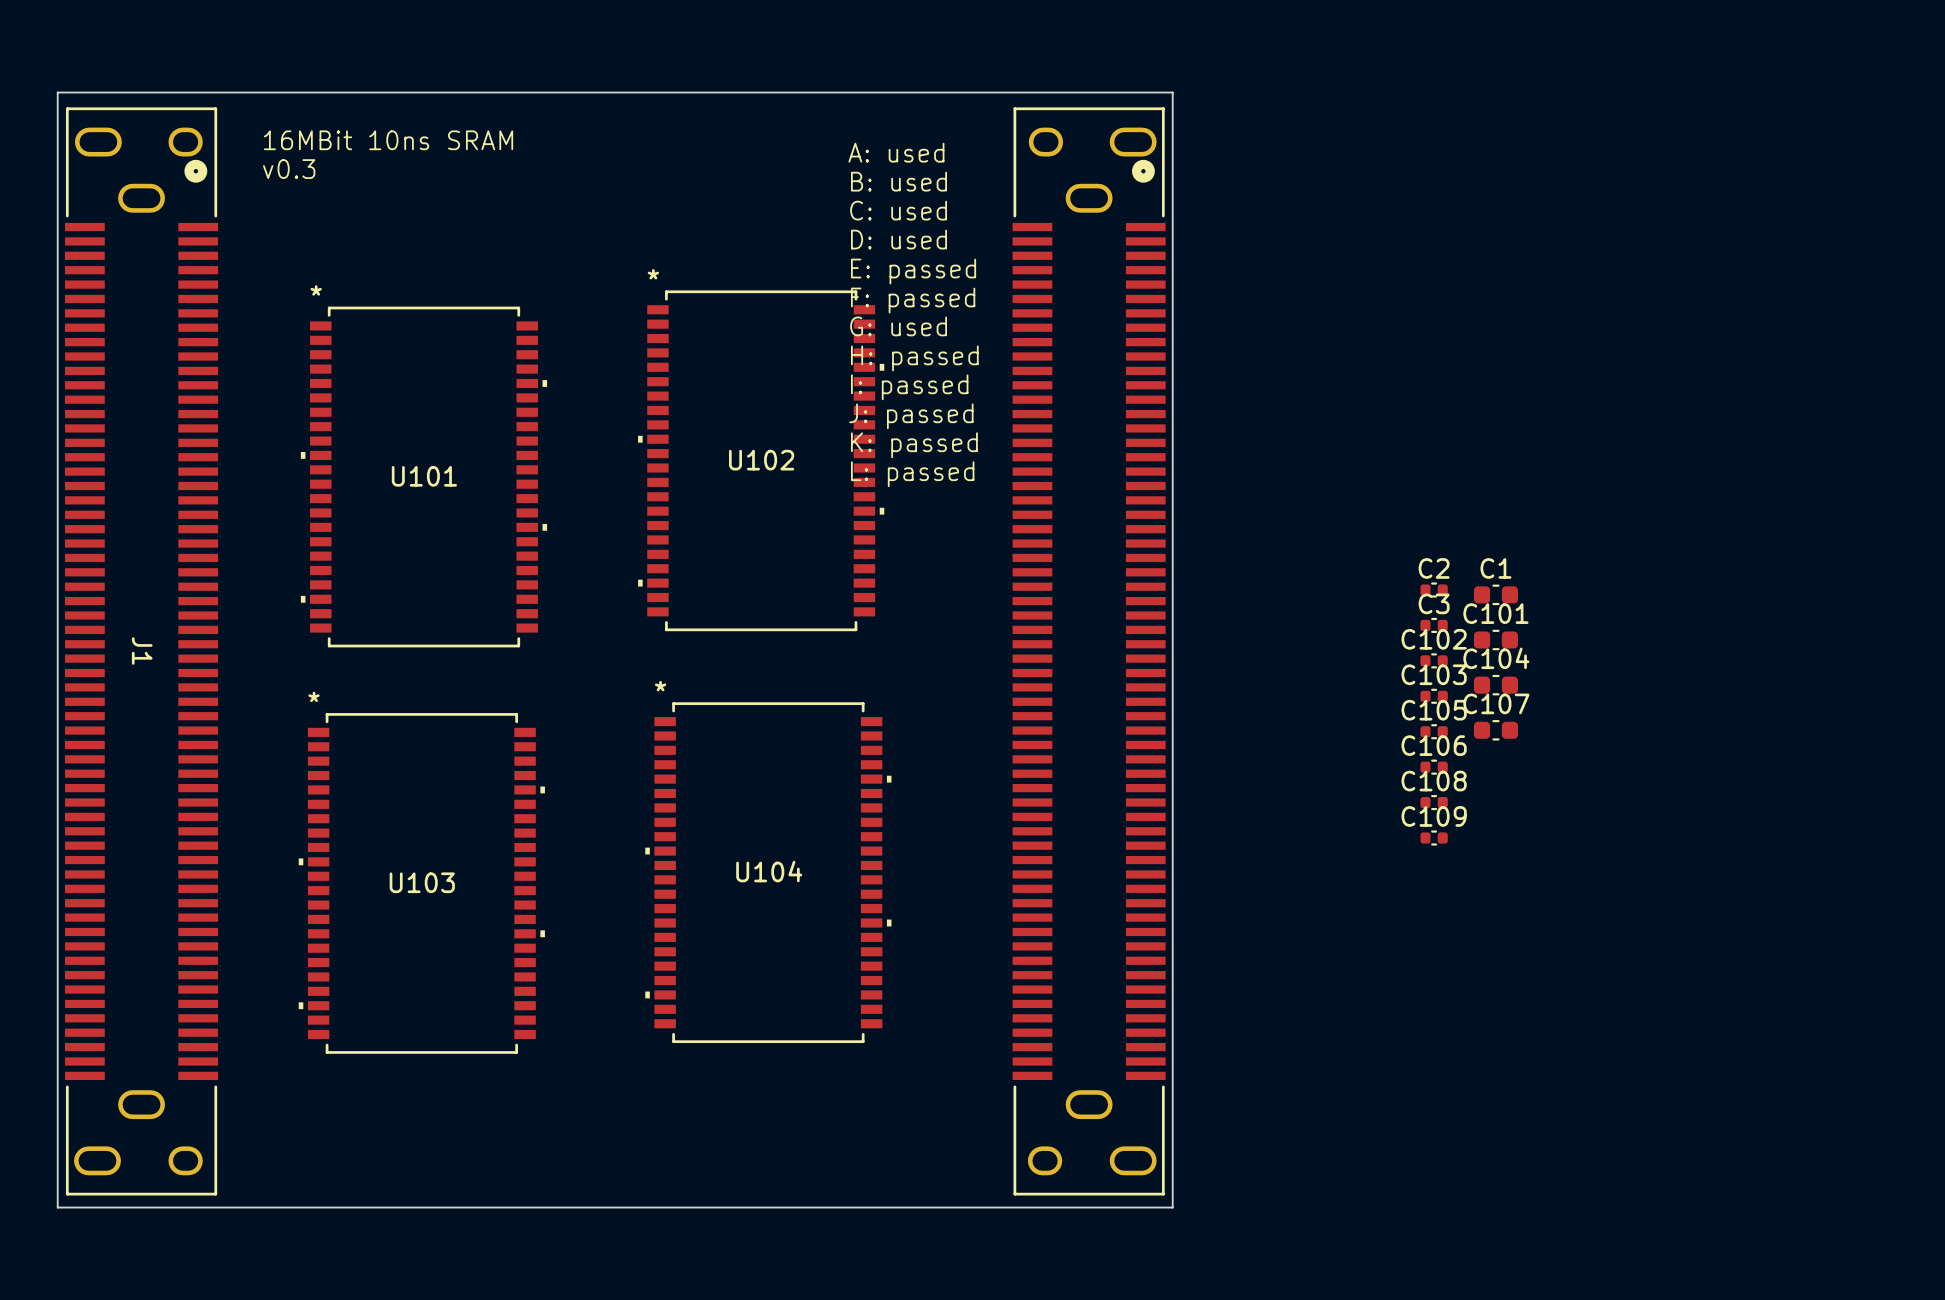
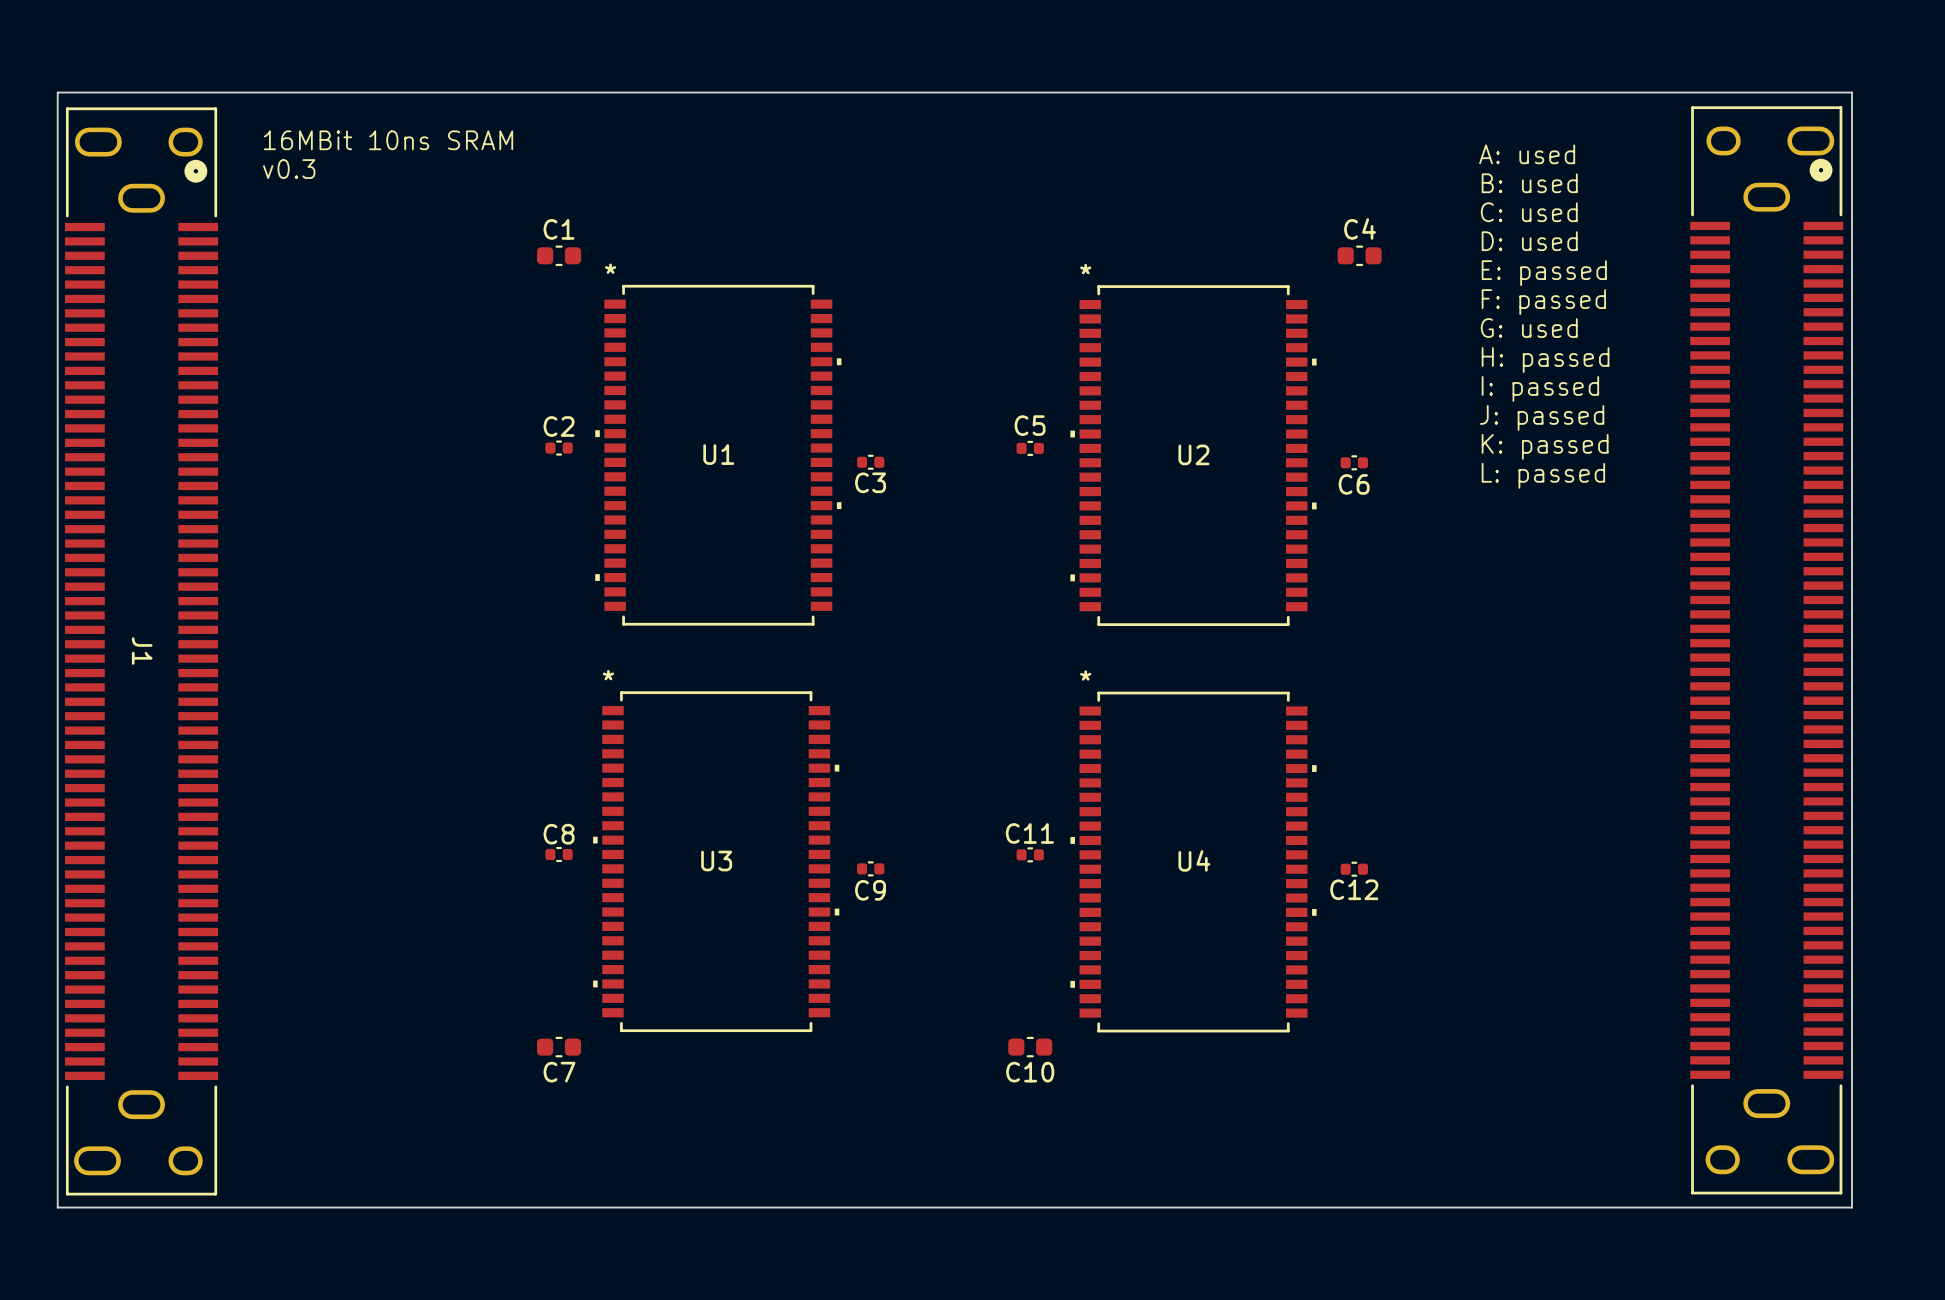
board edge: (1172, 92) (1172, 1207) -> (1172, 92) (1851, 92) (1851, 1207) (1172, 1207)
text: A: used (896, 152) -> none
text: none -> A: used (1527, 154)
text: B: used (899, 181) -> none
text: none -> B: used (1529, 183)
text: C: used (898, 210) -> none
text: none -> C: used (1529, 212)
text: D: used (899, 239) -> none
text: none -> D: used (1529, 241)
C4: none -> (1359, 255)
text: E: passed (913, 271) -> none
text: none -> E: passed (1544, 273)
text: F: passed (913, 300) -> none
text: none -> F: passed (1543, 302)
text: G: used (898, 326) -> none
text: none -> G: used (1529, 328)
text: H: passed (914, 358) -> none
text: none -> H: passed (1545, 360)
text: I: passed (909, 387) -> none
text: none -> I: passed (1540, 388)
text: J: passed (911, 416) -> none
text: none -> J: passed (1542, 417)
text: K: passed (914, 445) -> none
text: none -> K: passed (1545, 446)
C5: none -> (1030, 448)
U1: none -> (718, 455)
U2: none -> (1193, 455)
U102: (761, 460) -> none
C6: none -> (1354, 462)
text: L: passed (912, 474) -> none
text: none -> L: passed (1543, 475)
U101: (423, 477) -> none
C2 position: (1434, 590) -> (559, 448)
C1 position: (1495, 594) -> (559, 255)
C3 name position: C3 (1434, 603) -> C3 (870, 482)
C3 position: (1434, 625) -> (870, 462)
C101: (1495, 640) -> none
part: none -> (1766, 650)
part: (1089, 651) -> none
C102: (1434, 660) -> none
C104: (1495, 685) -> none
C103: (1434, 696) -> none
C107: (1495, 730) -> none
C105: (1434, 731) -> none
C106: (1434, 767) -> none
C108: (1434, 802) -> none
C109: (1434, 838) -> none
C8: none -> (559, 854)
C11: none -> (1030, 854)
U3: none -> (716, 861)
U4: none -> (1193, 862)
C9: none -> (870, 868)
C12: none -> (1354, 869)
U104: (768, 872) -> none
U103: (421, 883) -> none
C7: none -> (559, 1047)
C10: none -> (1030, 1047)

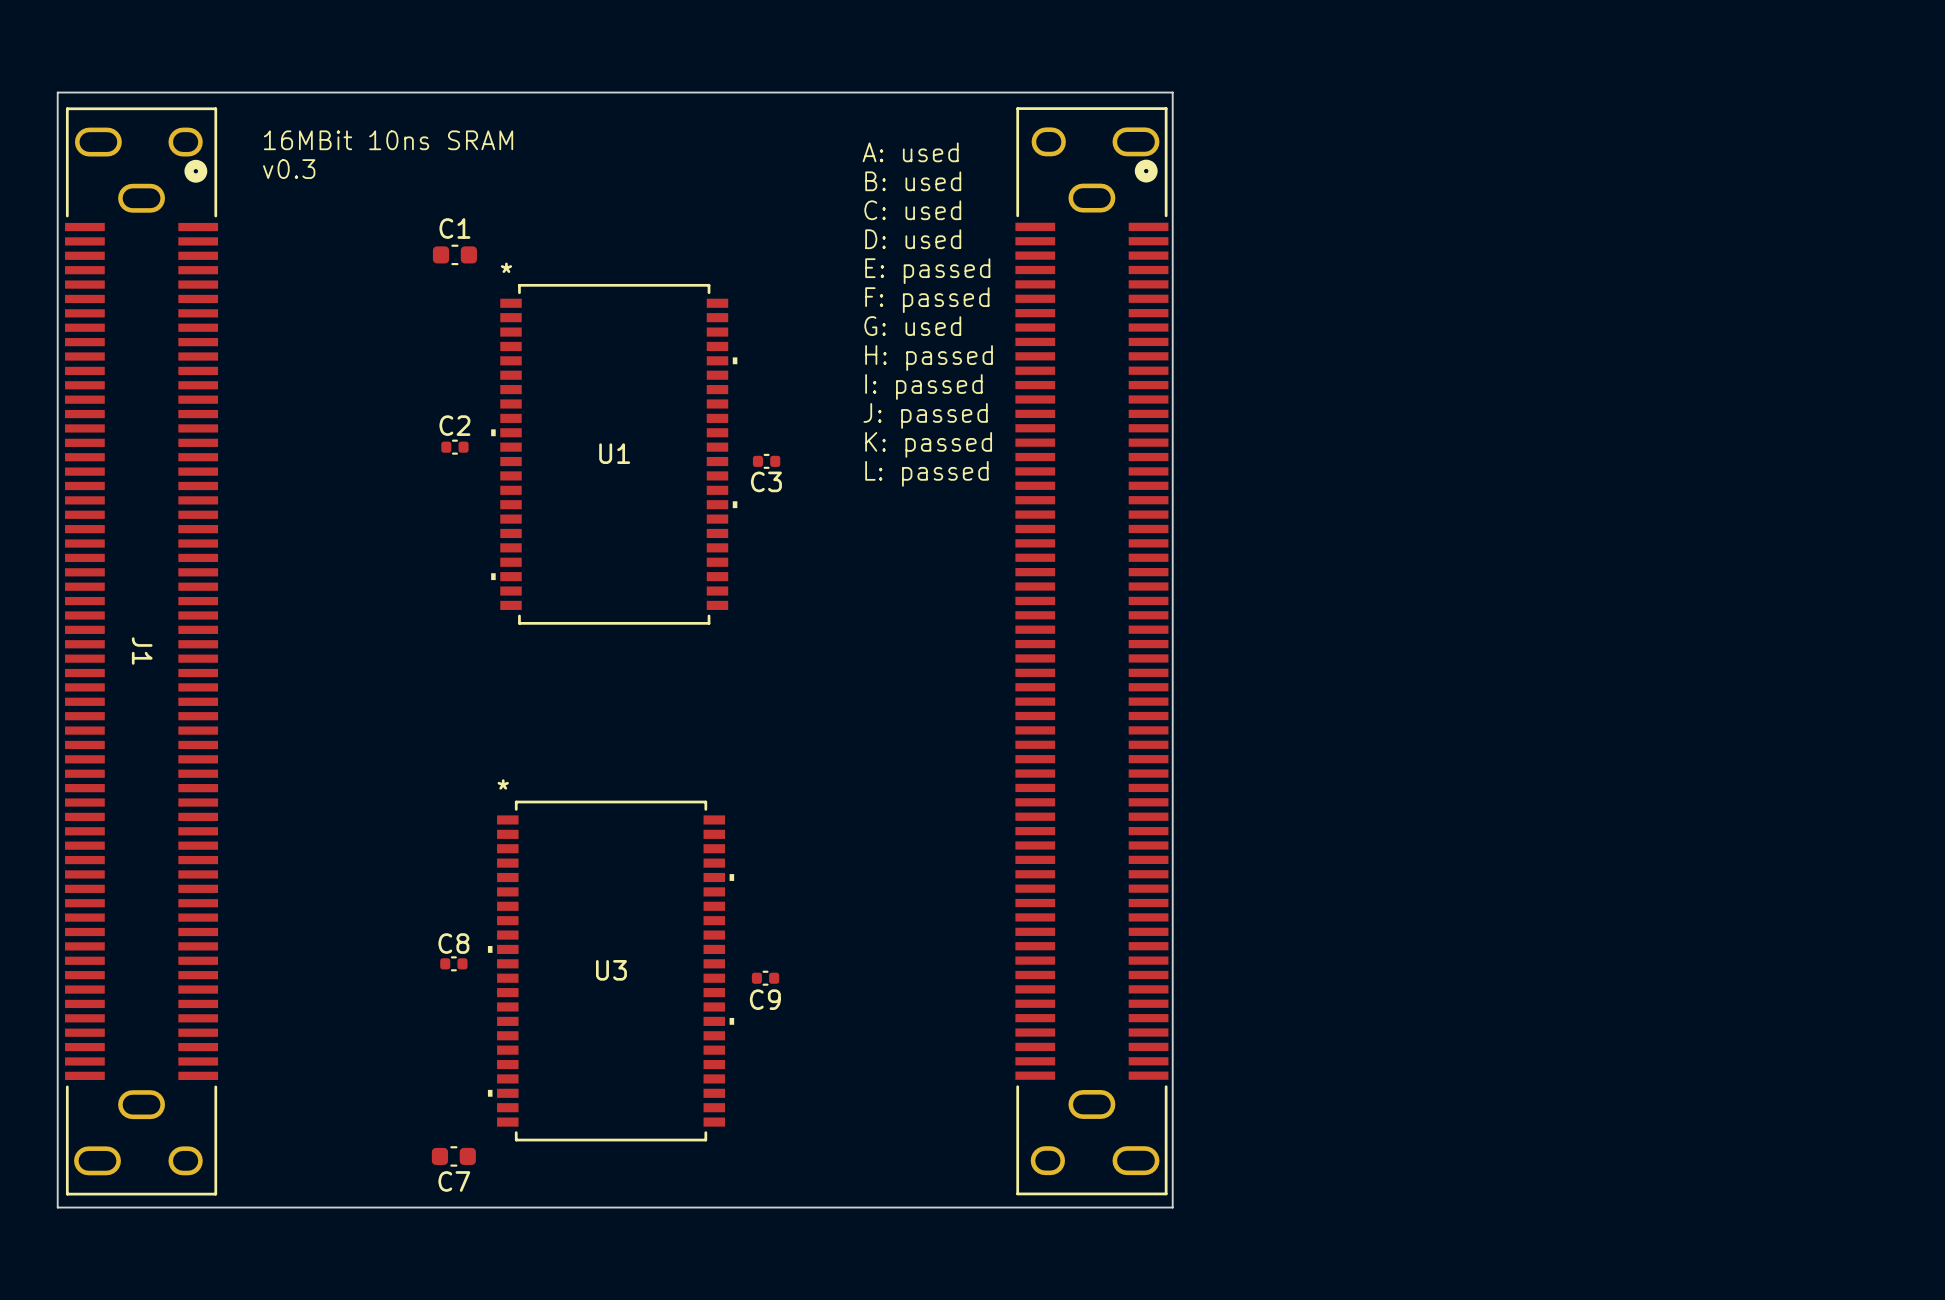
board edge: (1172, 92) (1851, 92) (1851, 1207) (1172, 1207) -> (1172, 92) (1172, 1207)
text: none -> A: used (910, 152)
text: A: used (1527, 154) -> none
text: none -> B: used (913, 181)
text: B: used (1529, 183) -> none
text: none -> C: used (912, 210)
text: C: used (1529, 212) -> none
text: none -> D: used (913, 239)
text: D: used (1529, 241) -> none
C1 position: (559, 255) -> (454, 254)
C4: (1359, 255) -> none
text: none -> E: passed (927, 271)
text: E: passed (1544, 273) -> none
text: none -> F: passed (927, 300)
text: F: passed (1543, 302) -> none
text: none -> G: used (912, 326)
text: G: used (1529, 328) -> none
text: none -> H: passed (929, 358)
text: H: passed (1545, 360) -> none
text: none -> I: passed (923, 386)
text: I: passed (1540, 388) -> none
text: none -> J: passed (925, 415)
text: J: passed (1542, 417) -> none
text: none -> K: passed (928, 444)
text: K: passed (1545, 446) -> none
C2 position: (559, 448) -> (454, 447)
C5: (1030, 448) -> none
U1 position: (718, 455) -> (614, 454)
U2: (1193, 455) -> none
C3 position: (870, 462) -> (766, 461)
C6: (1354, 462) -> none
text: none -> L: passed (926, 473)
text: L: passed (1543, 475) -> none
part: (1766, 650) -> none
part: none -> (1091, 651)
C8 position: (559, 854) -> (453, 963)
C11: (1030, 854) -> none
U3 position: (716, 861) -> (611, 971)
U4: (1193, 862) -> none
C9 position: (870, 868) -> (765, 978)
C12: (1354, 869) -> none
C7 position: (559, 1047) -> (453, 1156)
C10: (1030, 1047) -> none

